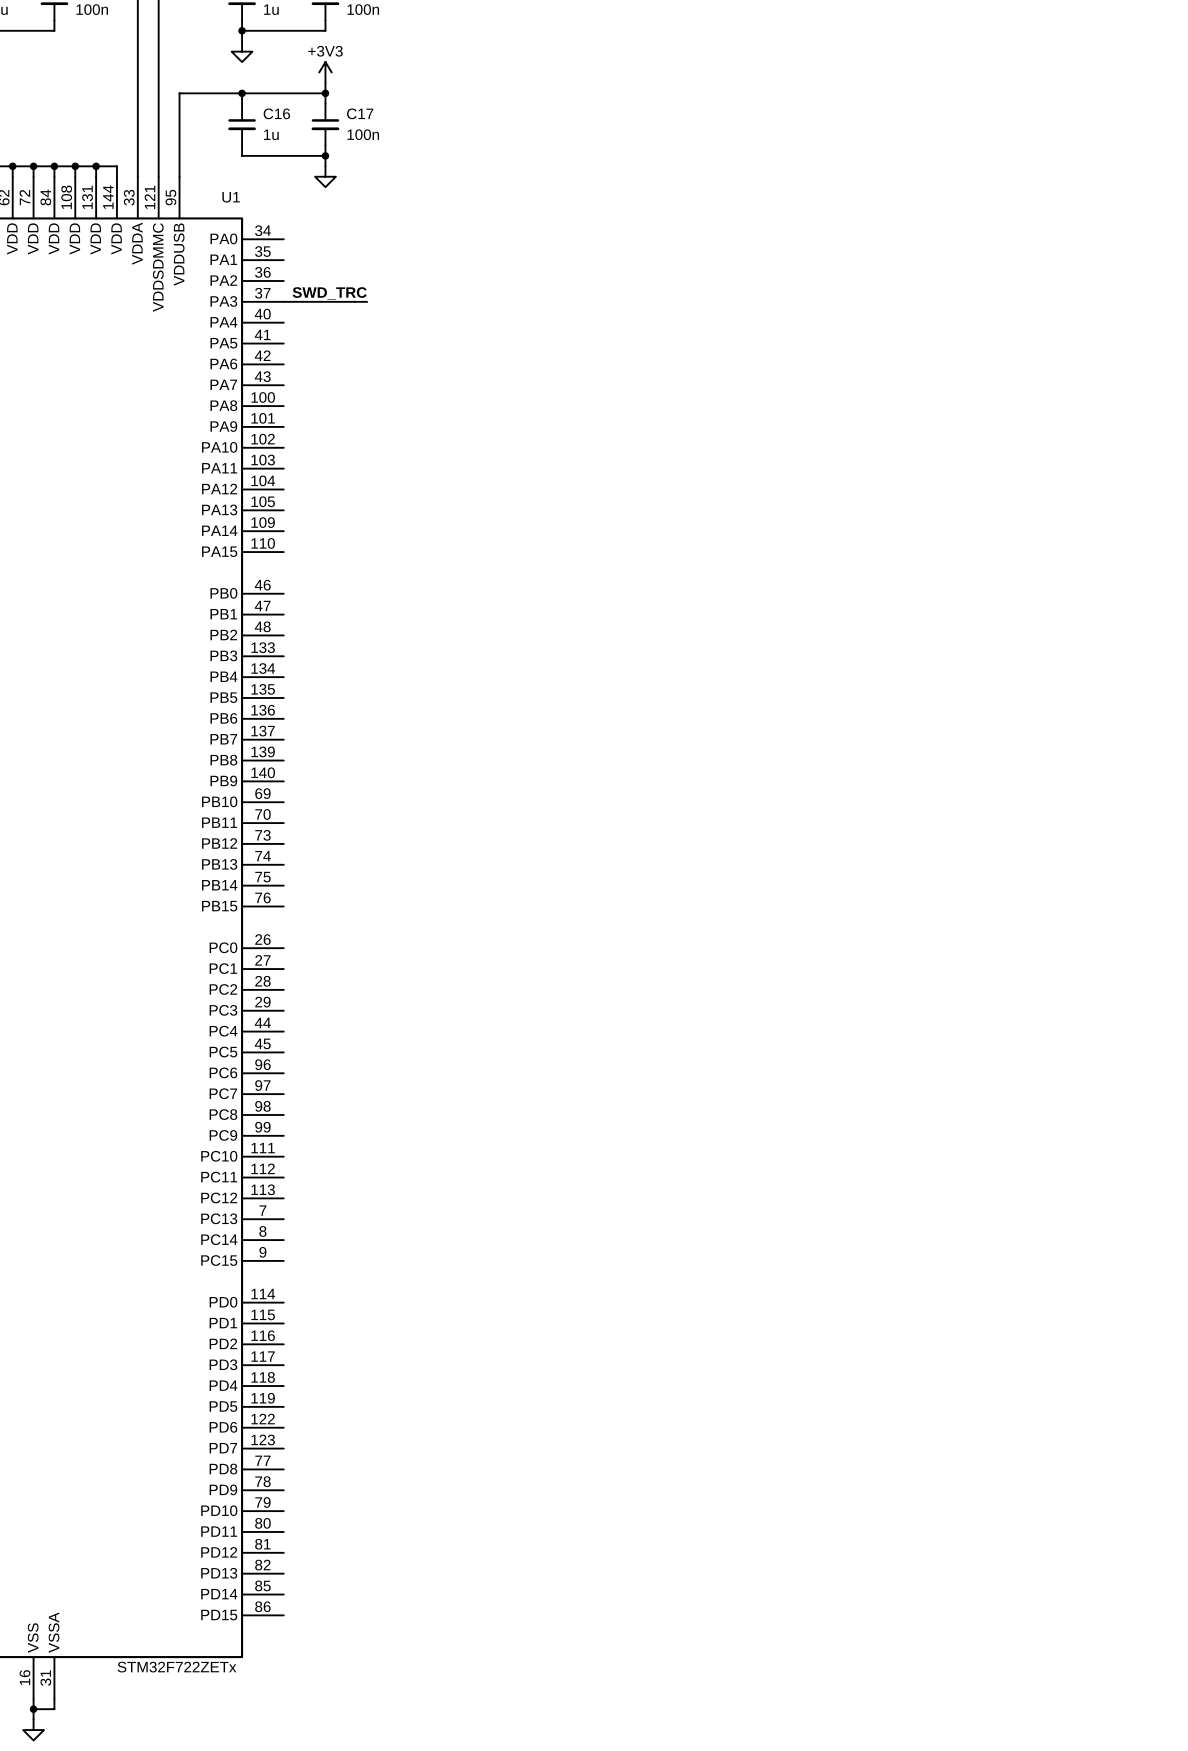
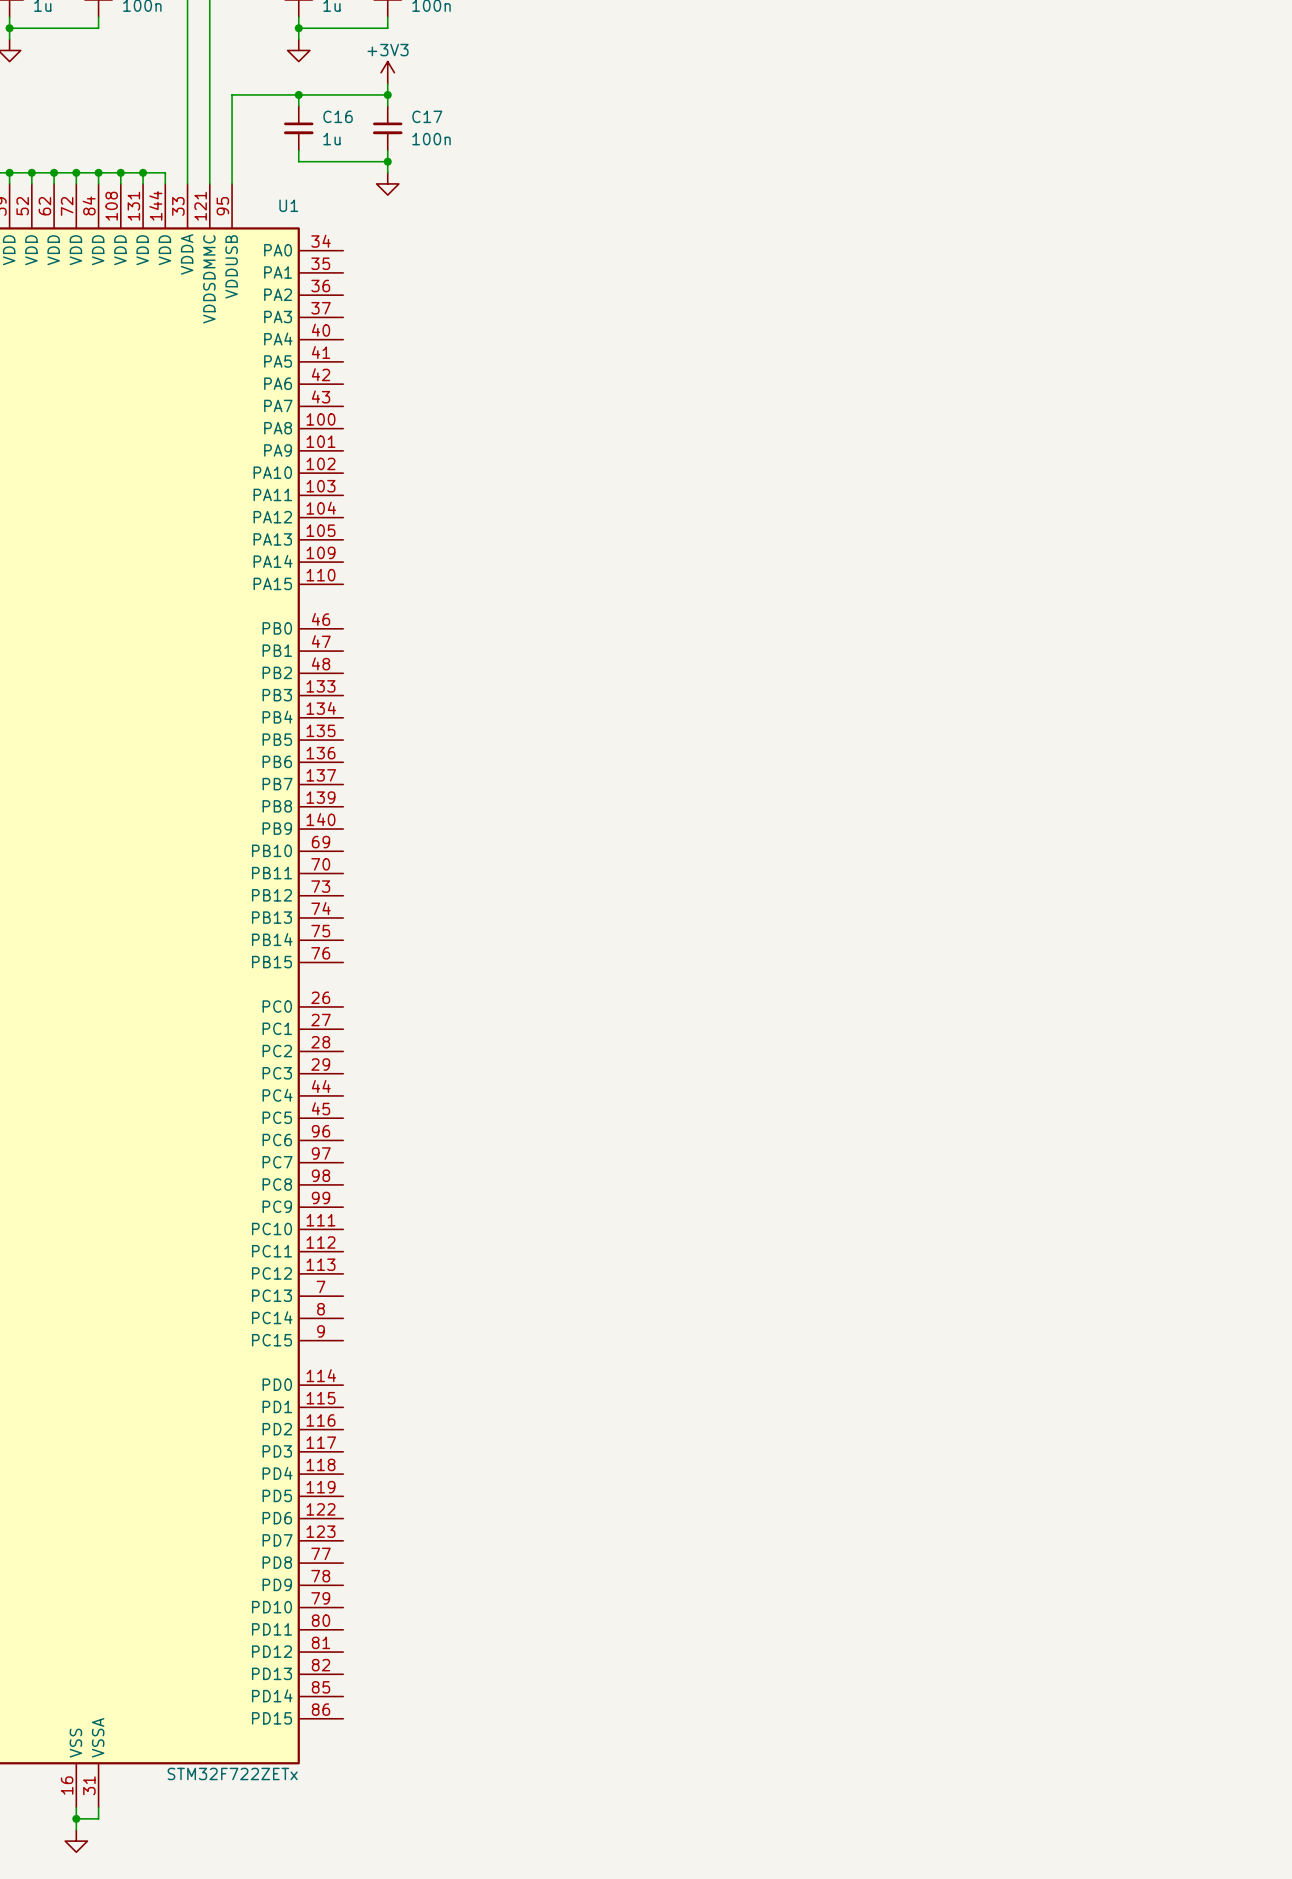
label: SWD_TRC (329, 293) -> none
wire: (283, 301) (367, 301) -> none

